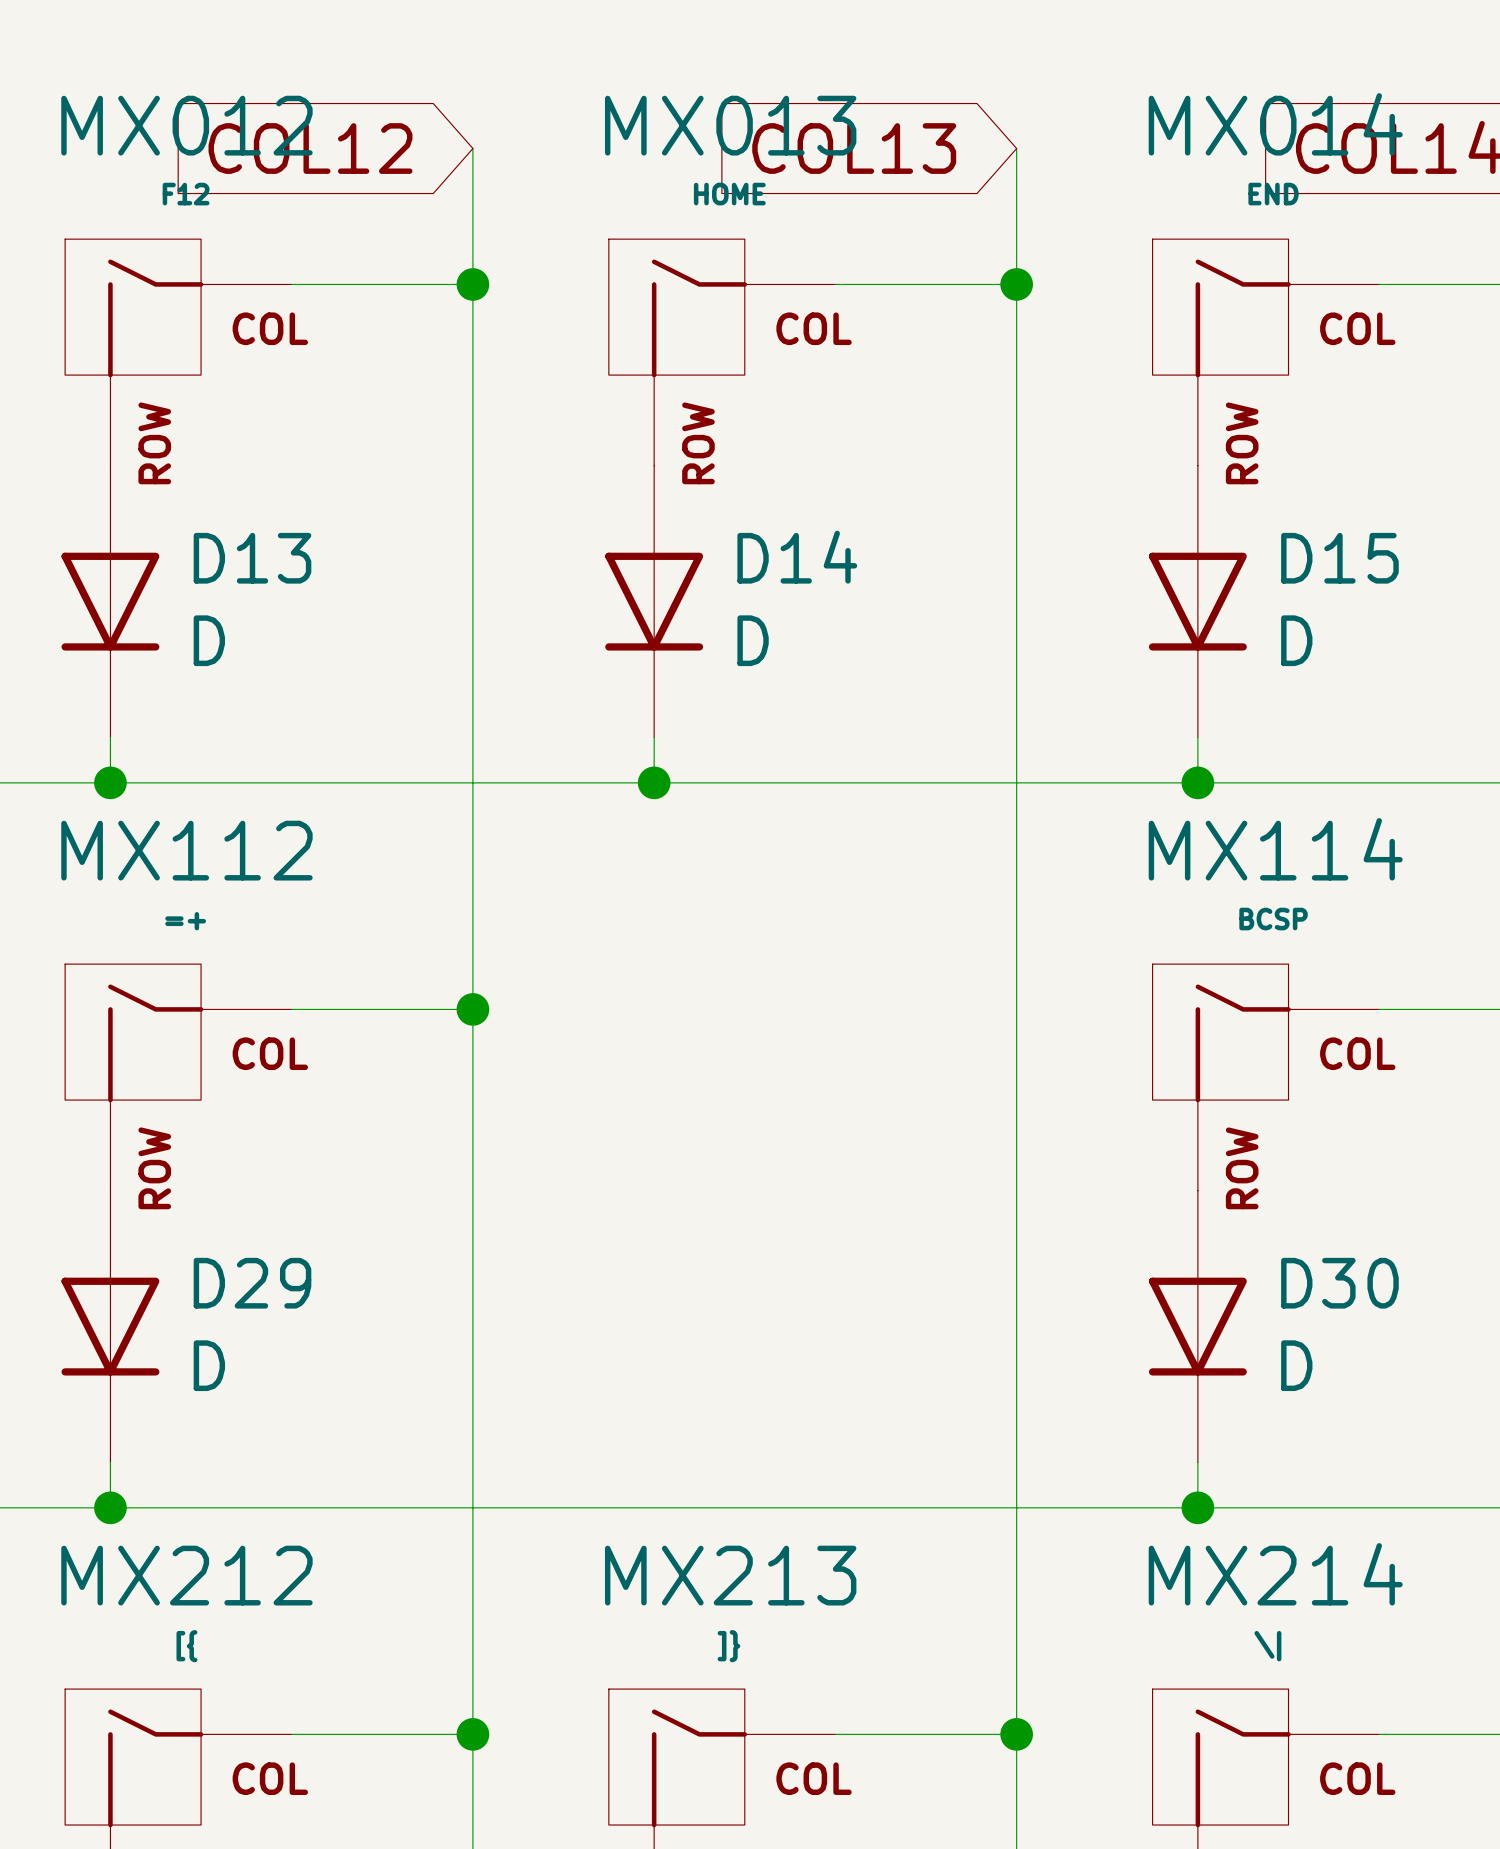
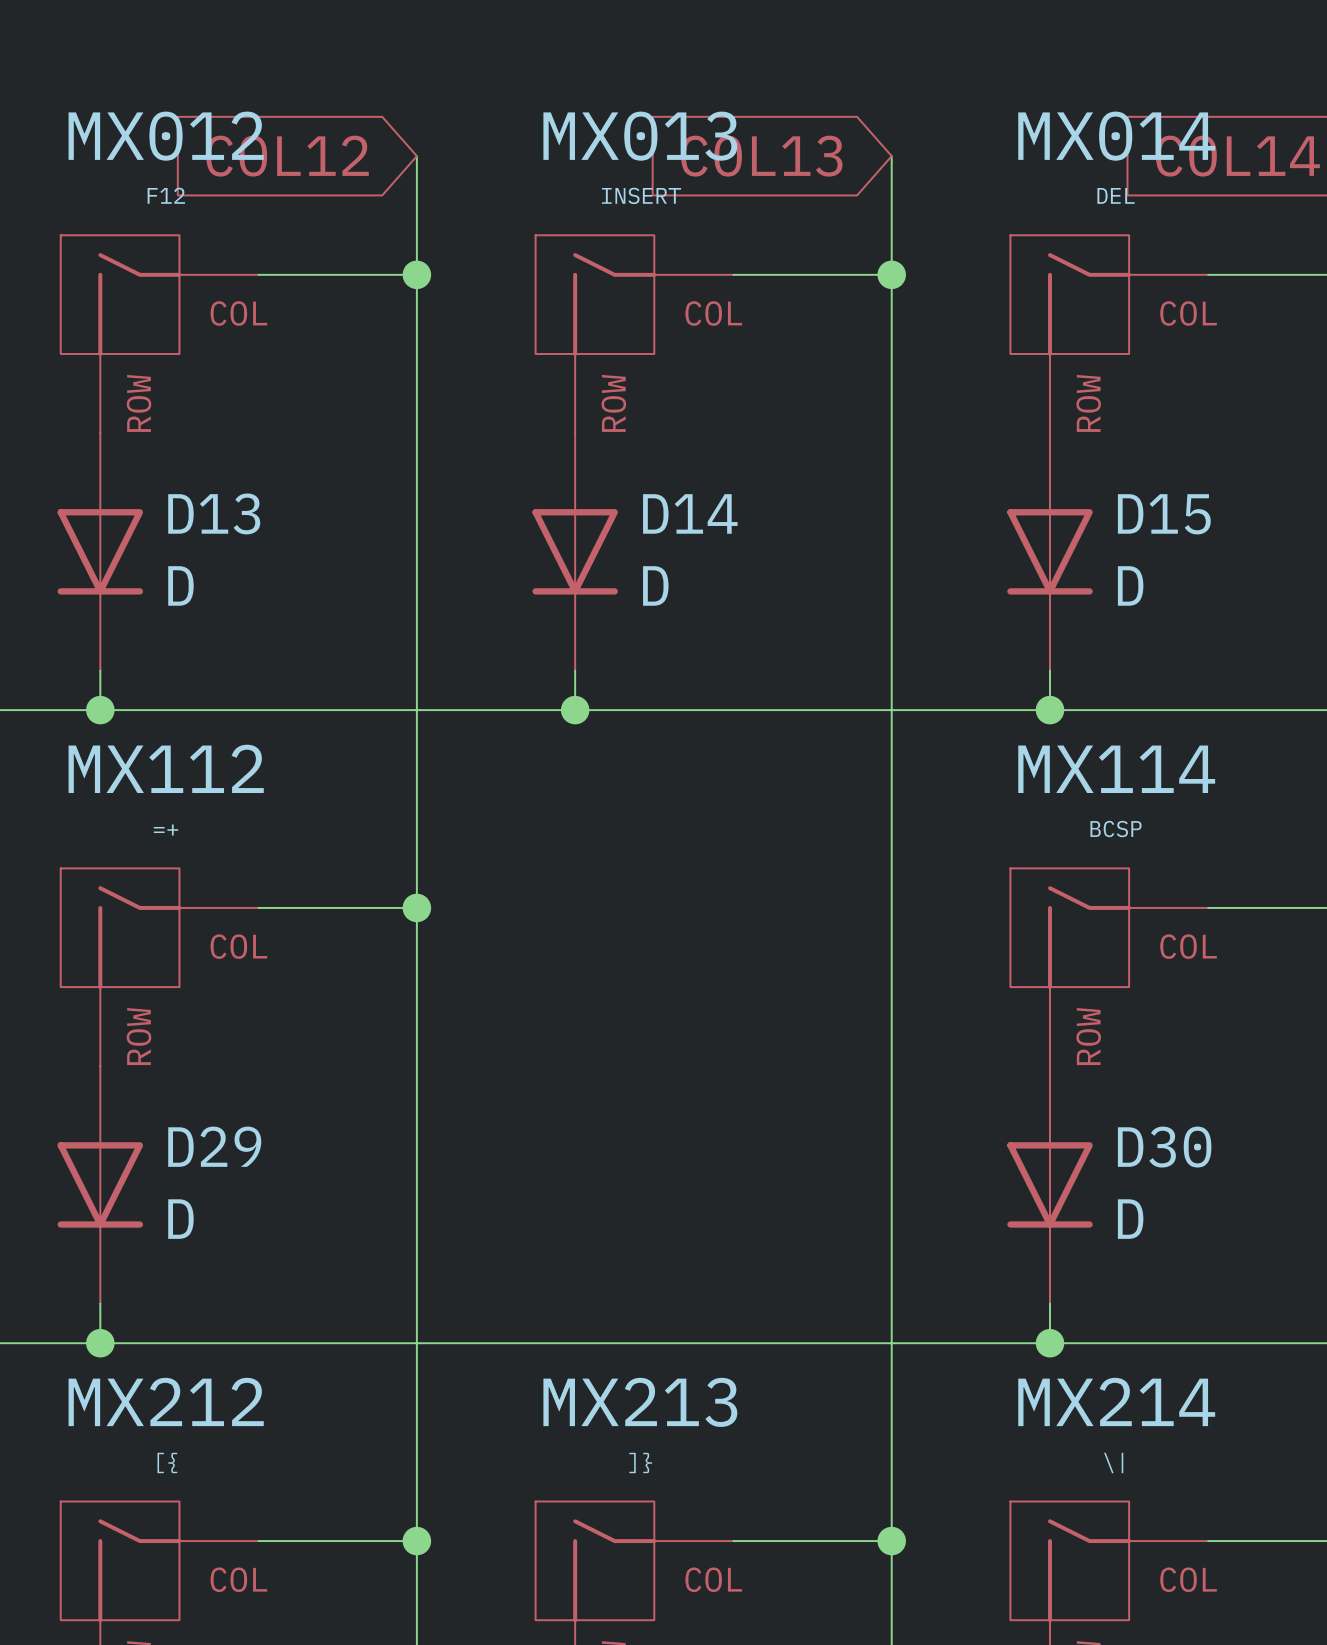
MX013 value: HOME (729, 194) -> INSERT (641, 195)
MX014 value: END (1273, 194) -> DEL (1116, 195)

